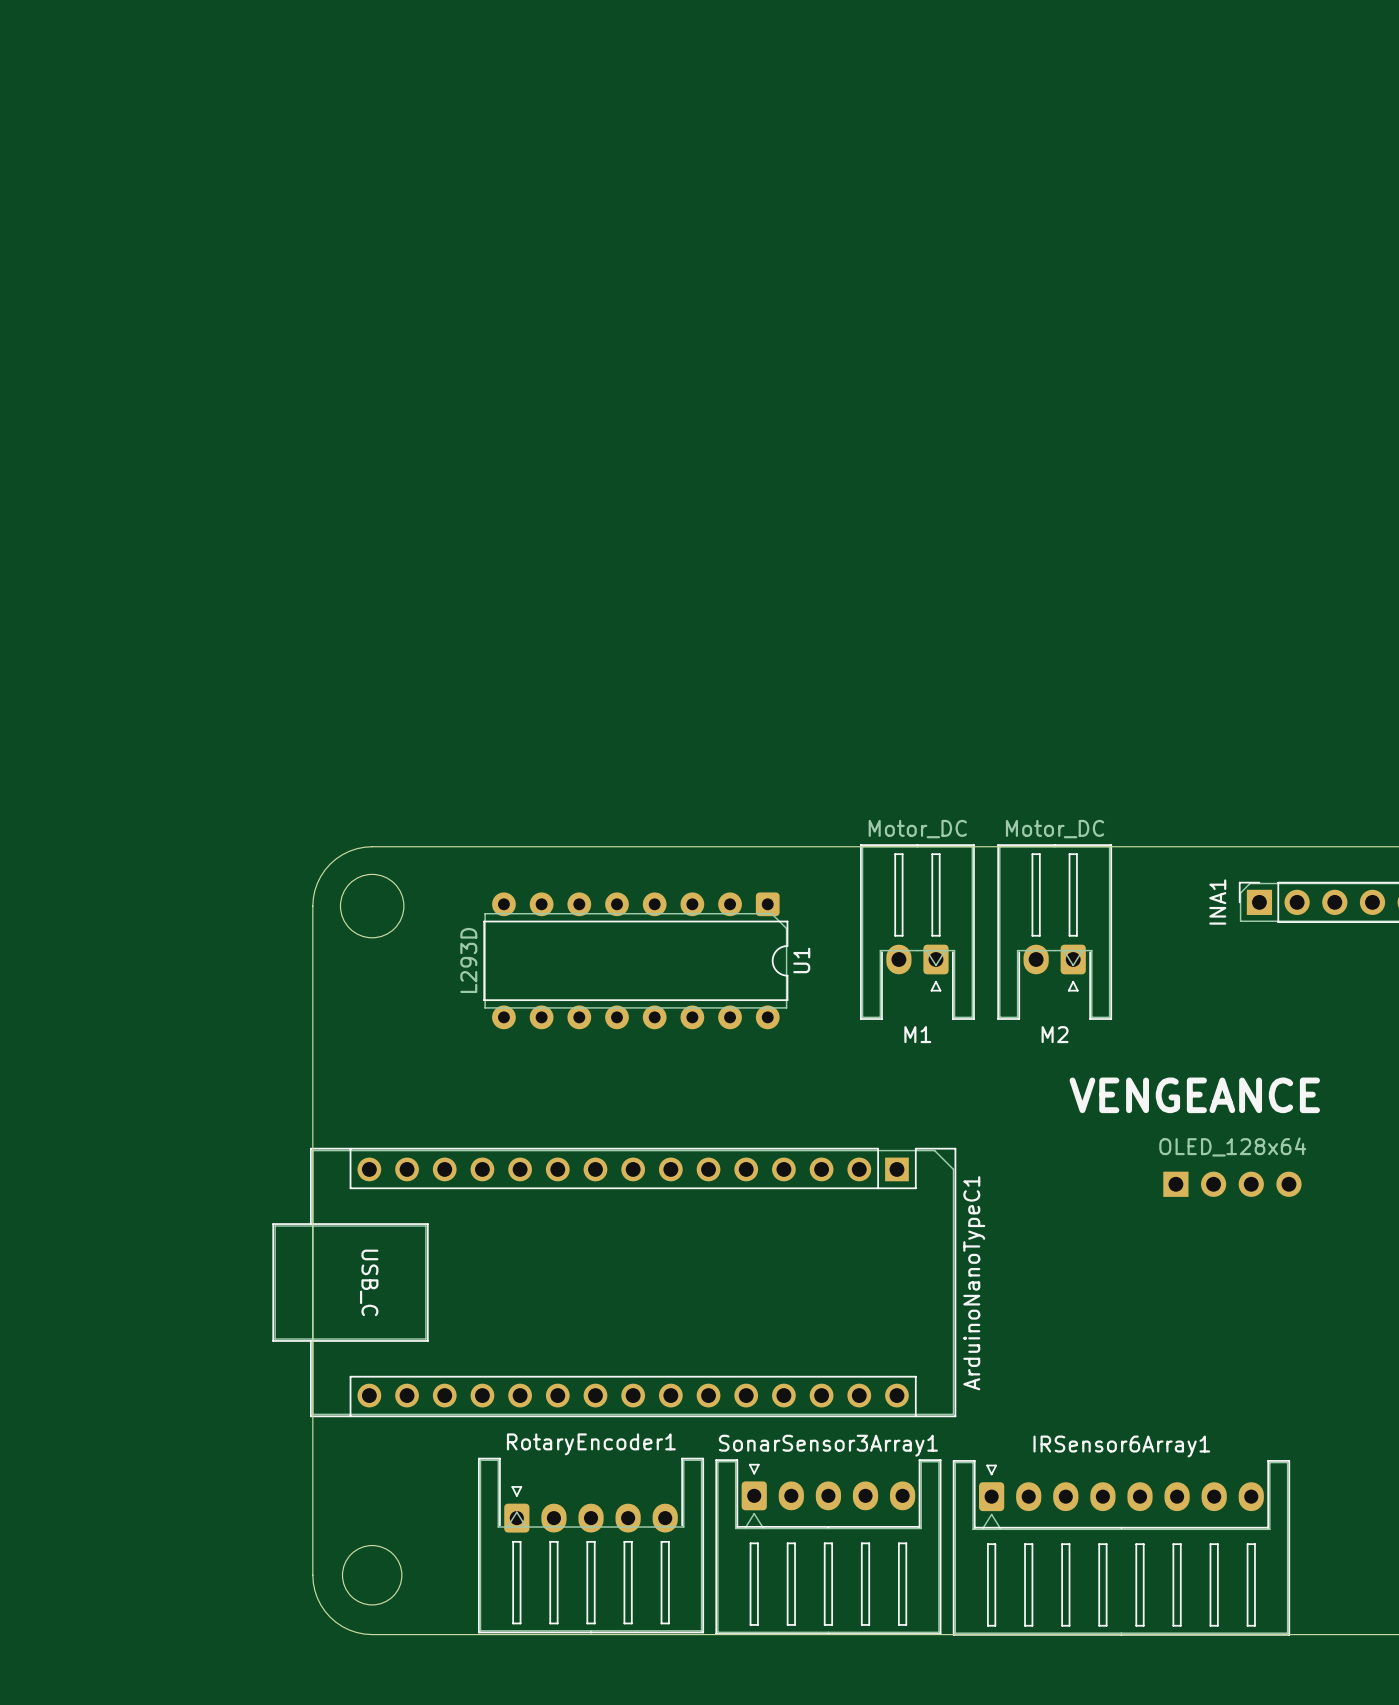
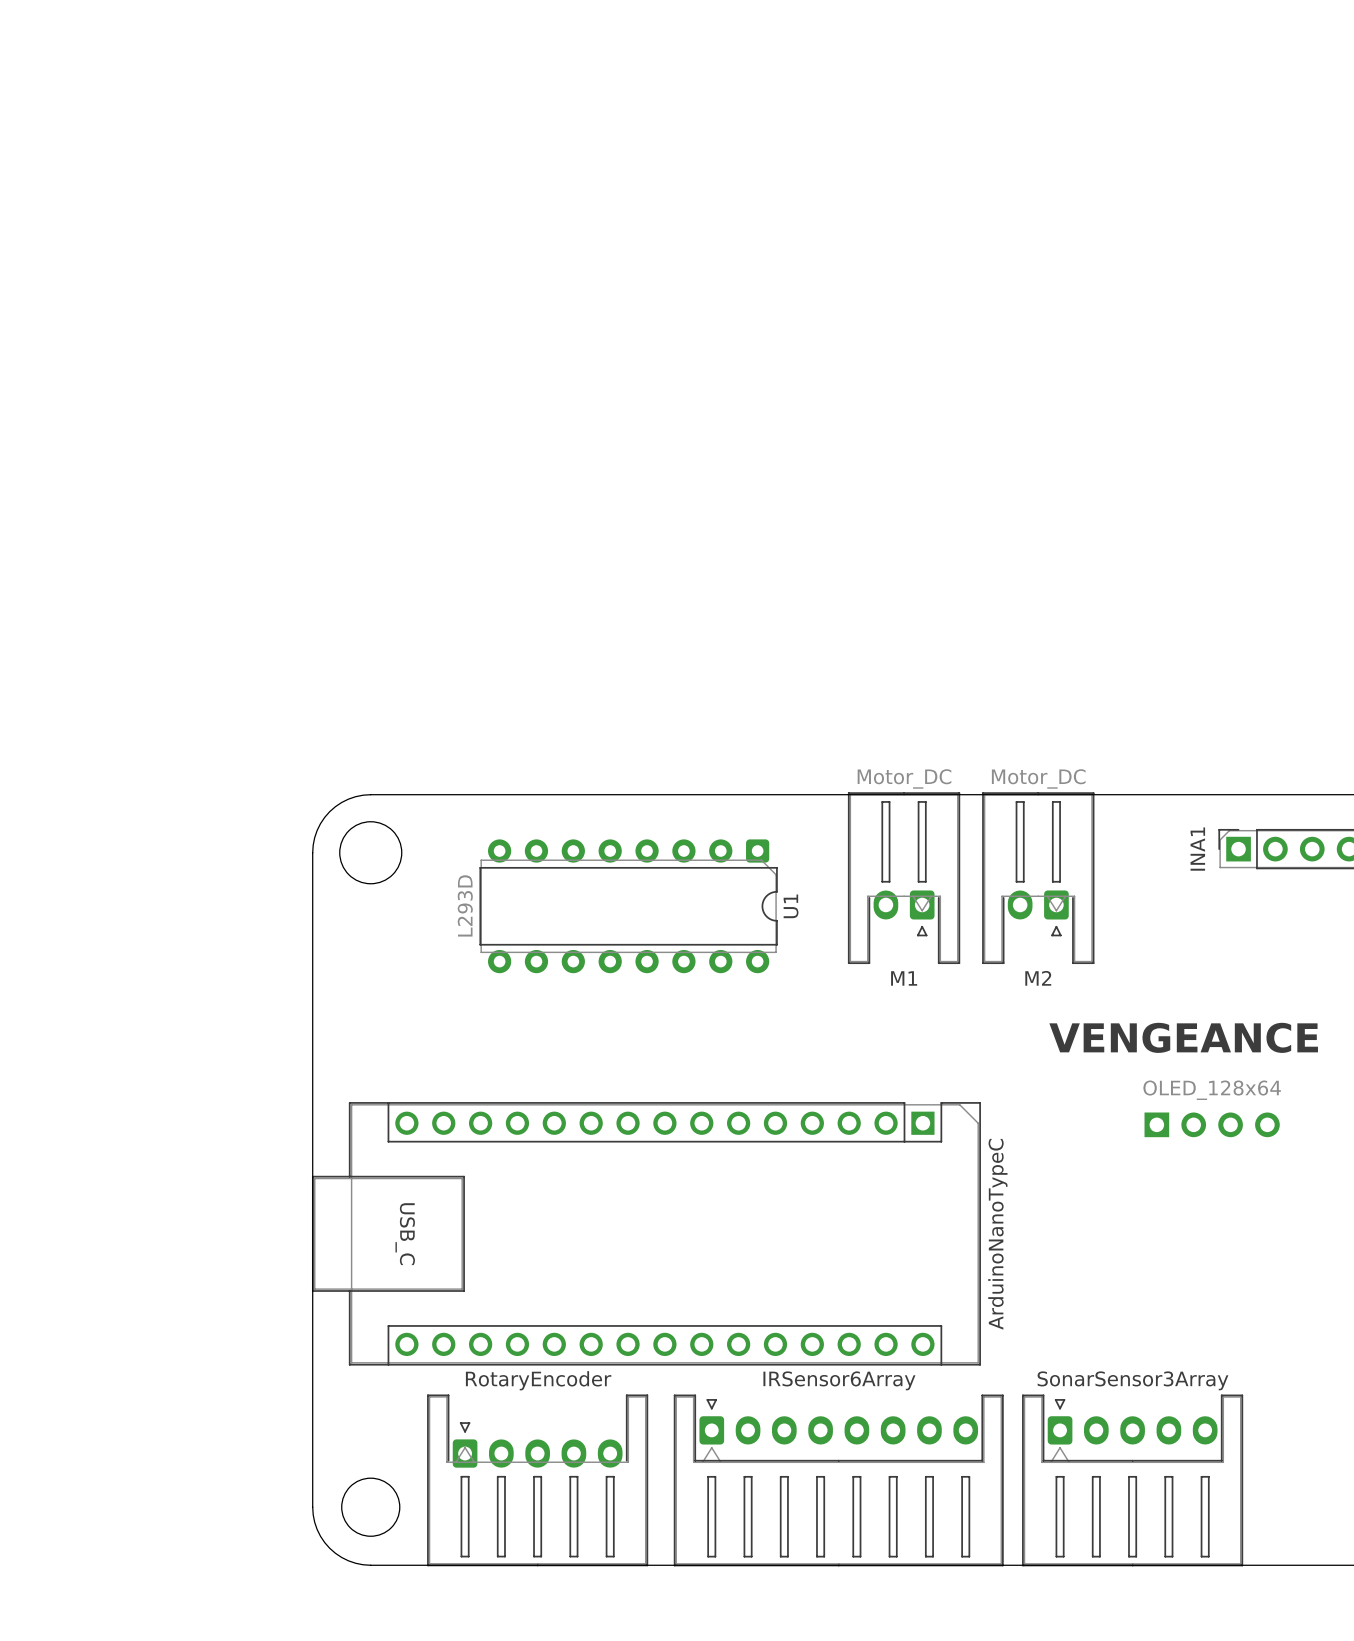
ArduinoNanoTypeC1: (614, 1282) -> none
ArduinoNanoTypeC: none -> (646, 1233)
RotaryEncoder1: (591, 1545) -> none
RotaryEncoder: none -> (537, 1480)
SonarSensor3Array1: (828, 1547) -> none
IRSensor6Array: none -> (838, 1480)
IRSensor6Array1: (1121, 1547) -> none
SonarSensor3Array: none -> (1132, 1480)

